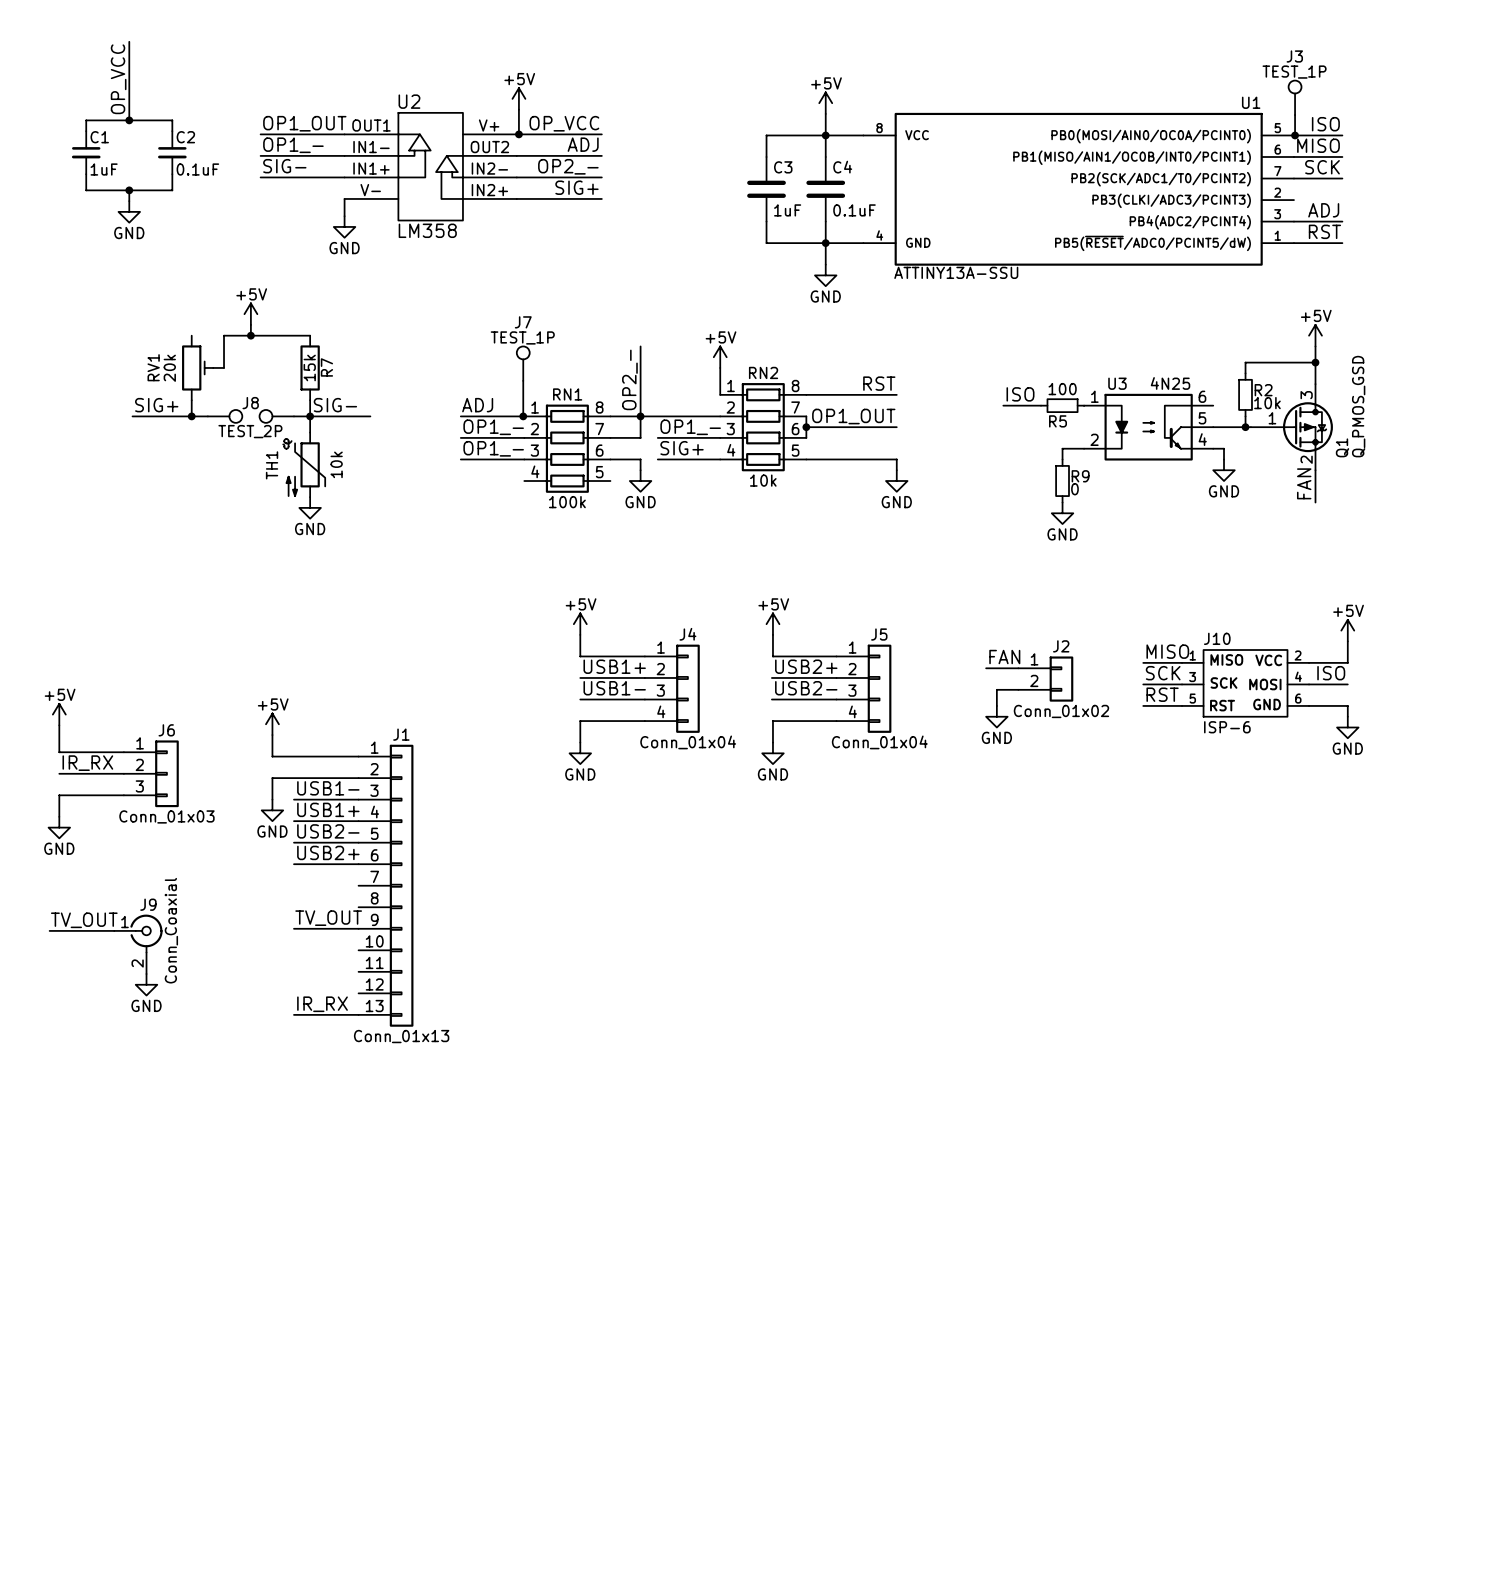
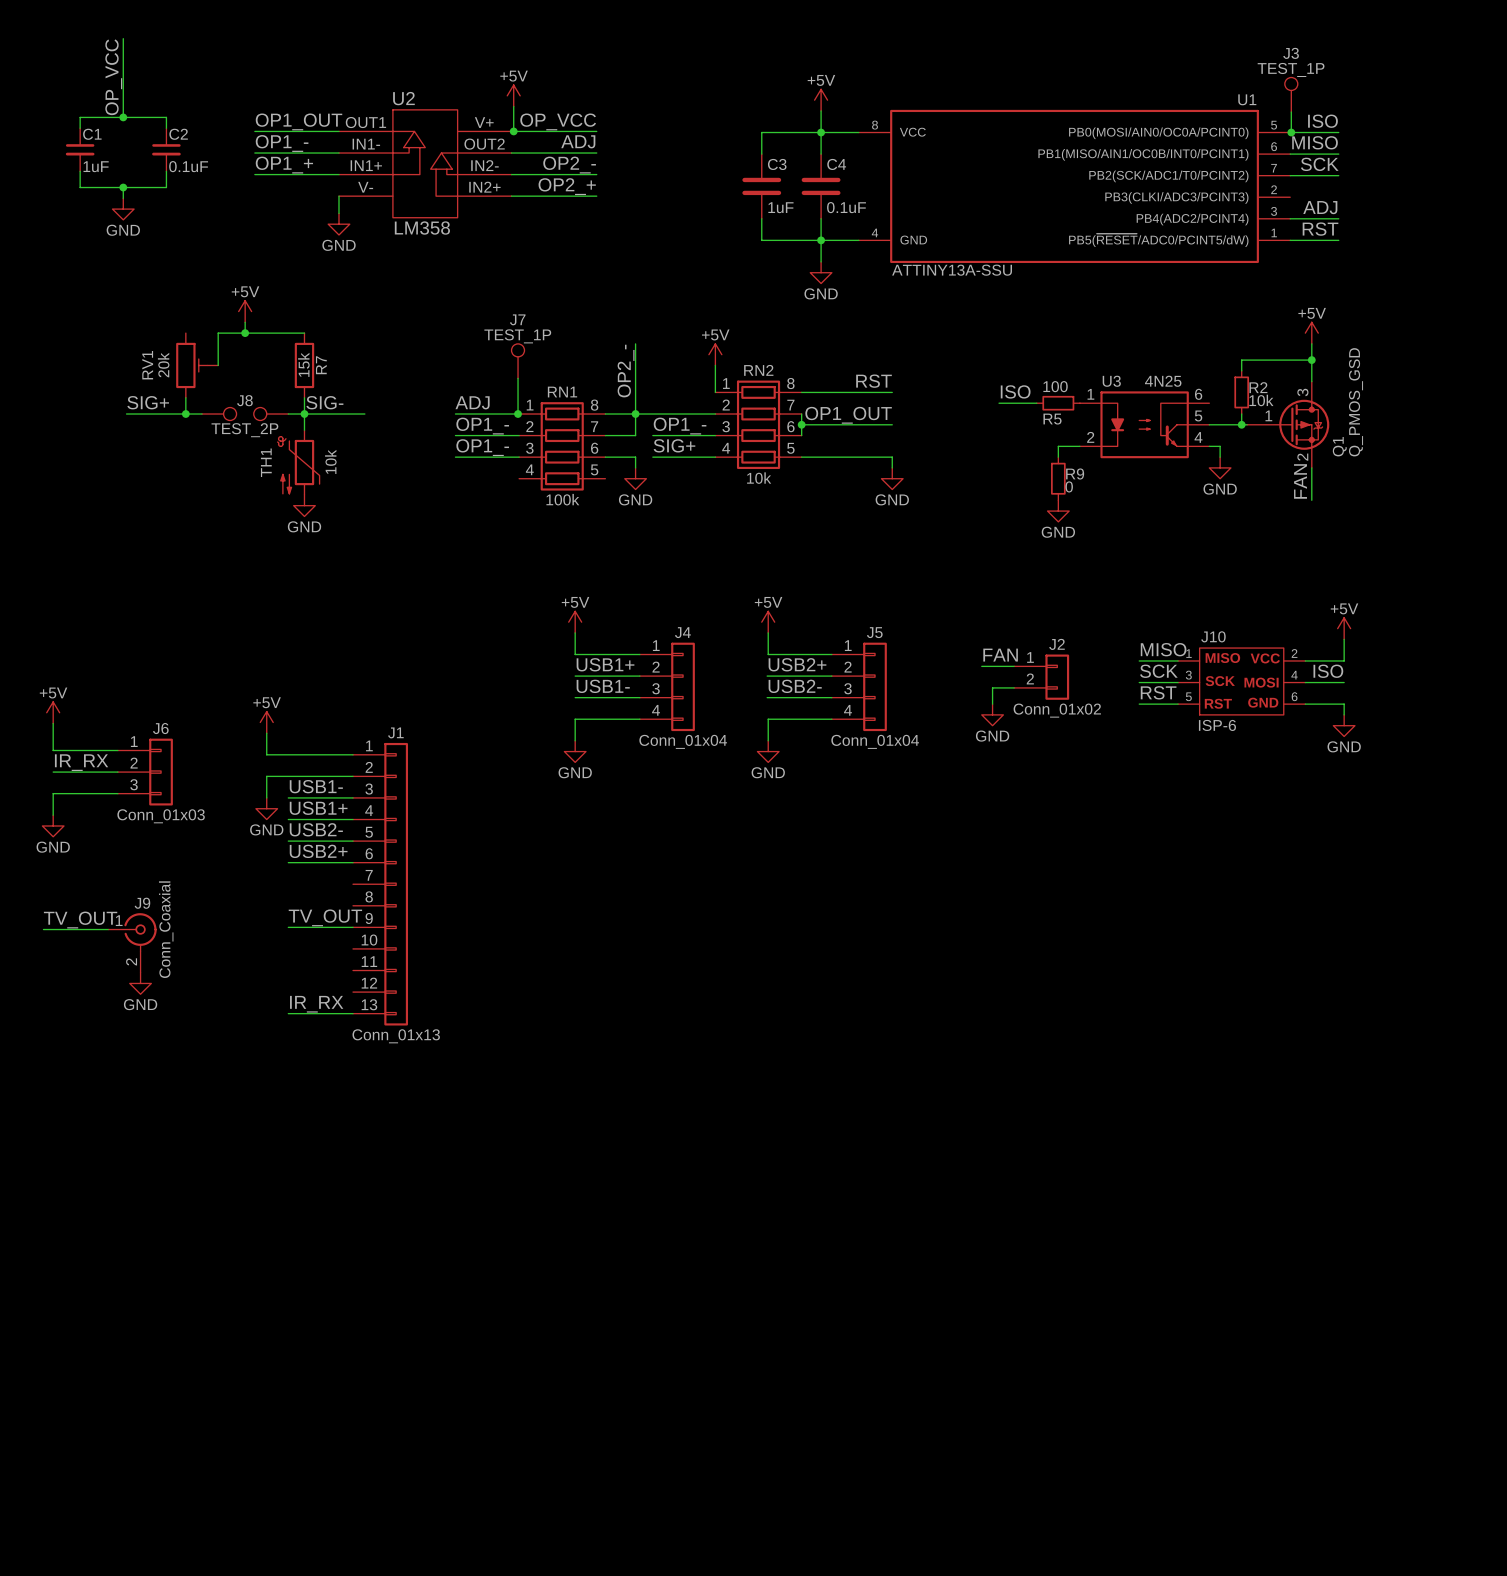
label: SIG- (284, 166) -> OP1_+ (284, 165)
label: SIG+ (576, 187) -> OP2_+ (567, 186)

